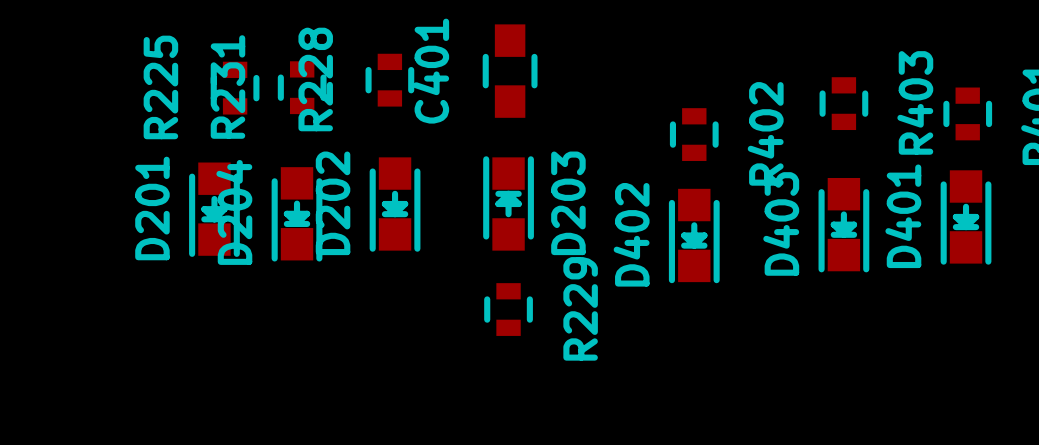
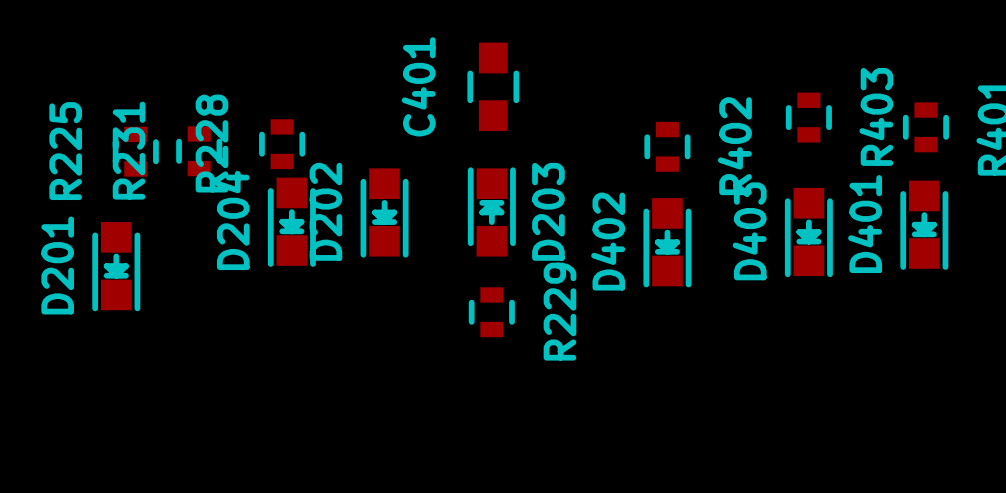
R228 position: (389, 80) -> (282, 144)
R231 position: (302, 87) -> (199, 151)
R225 position: (235, 88) -> (135, 151)
D201 position: (214, 209) -> (116, 266)

